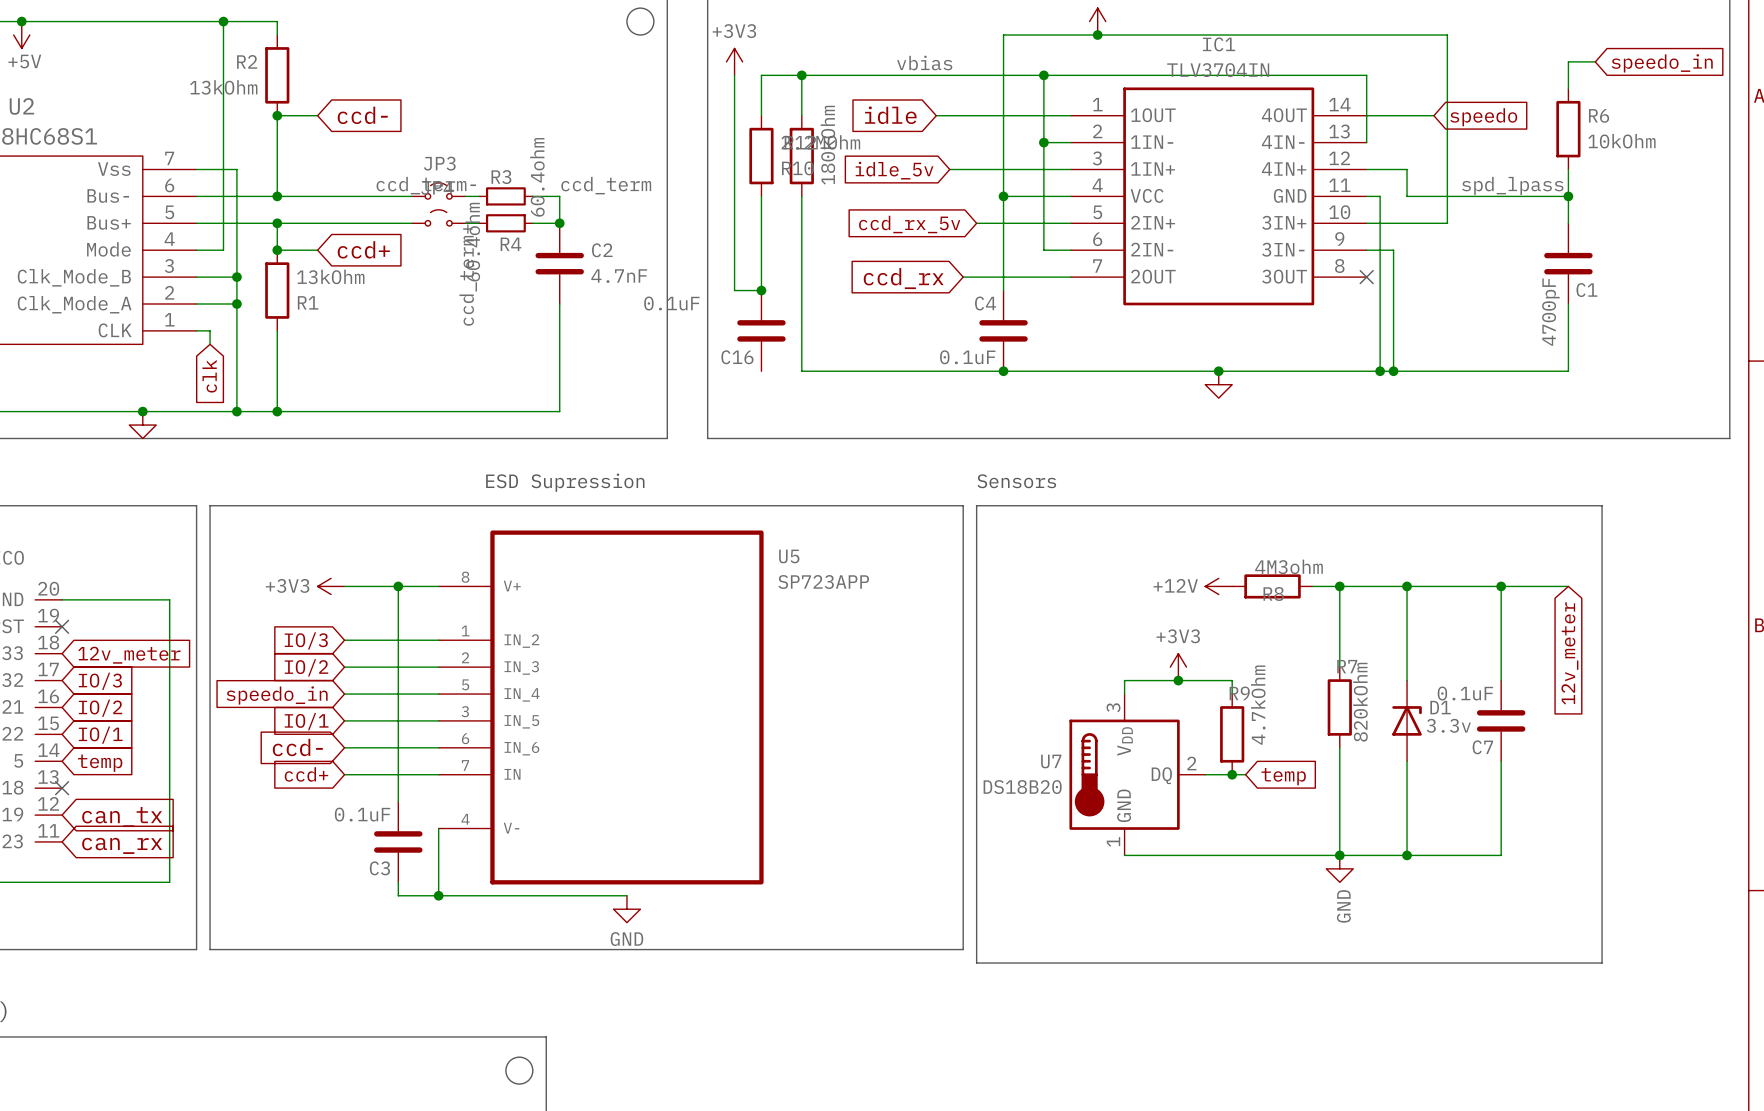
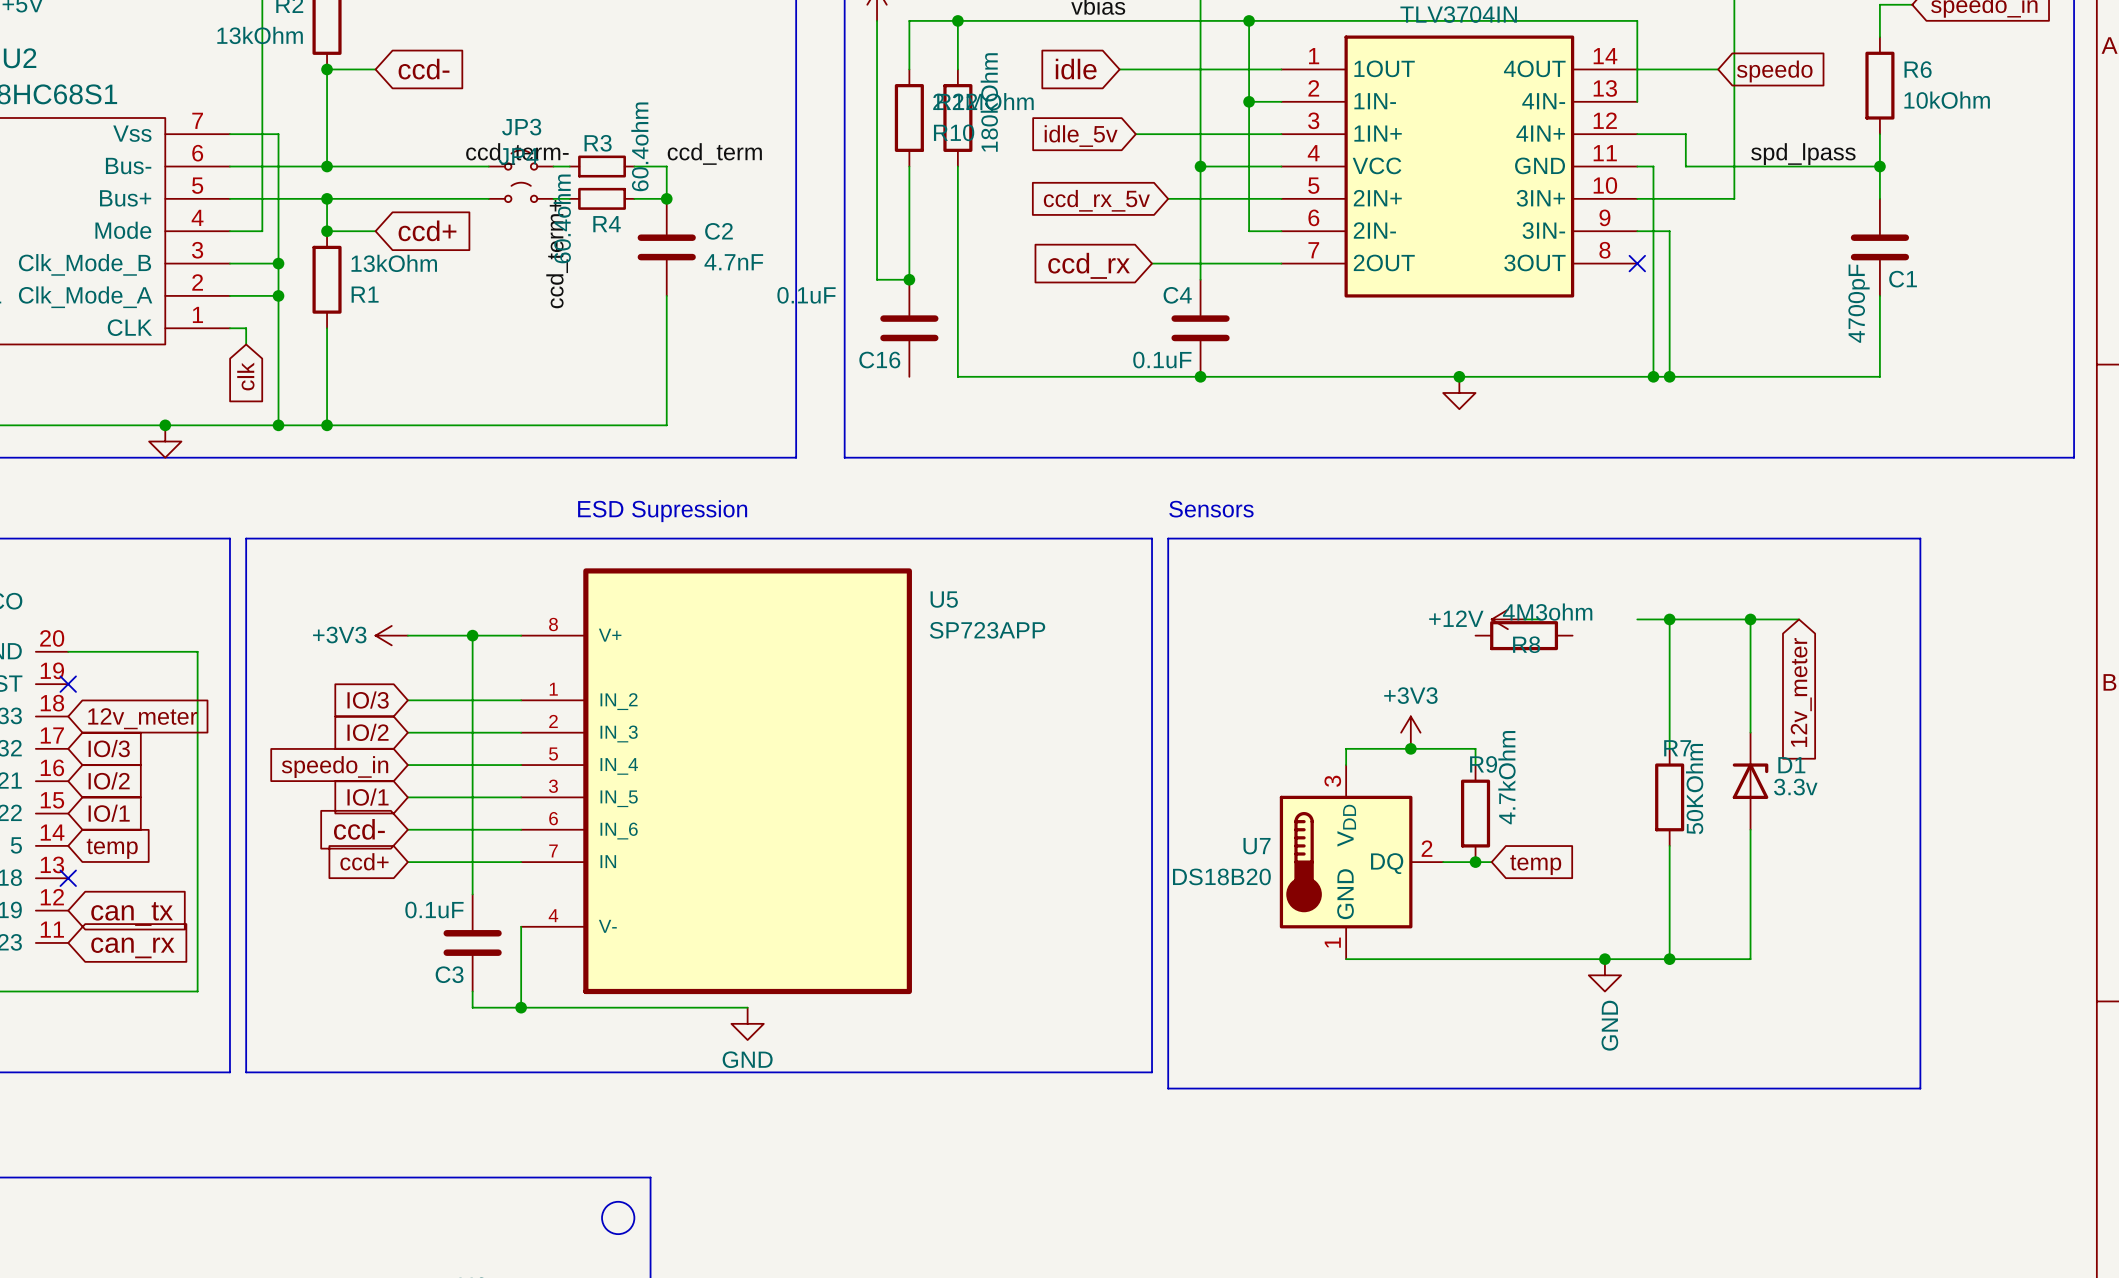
wire: none -> (1524, 619) (1540, 619)
wire: none -> (1637, 619) (1799, 619)
junction: none -> (1750, 619)
power symbol position: +12V (1218, 586) -> +12V (1507, 619)
wire: (1312, 586) (1568, 586) -> none
wire: (1339, 586) (1339, 667) -> none
junction: (1339, 586) -> none
wire: (1407, 586) (1407, 680) -> none
junction position: (1407, 586) -> (1669, 619)
wire: (1501, 586) (1501, 680) -> (1750, 619) (1750, 732)
junction: (1501, 586) -> none
global label position: 12v_meter (1569, 653) -> 12v_meter (1801, 692)
R7 value: 820kOhm (1360, 702) -> 50KOhm (1694, 789)
R7 position: (1339, 707) -> (1669, 797)
D1 position: (1407, 720) -> (1750, 781)
C7: 0.1uF (1501, 720) -> none
wire: (1339, 747) (1339, 855) -> (1669, 619) (1669, 748)
wire: (1407, 761) (1407, 855) -> (1669, 845) (1669, 959)
wire: (1501, 761) (1501, 855) (1460, 855) -> (1750, 829) (1750, 959)
junction position: (1407, 855) -> (1669, 959)

